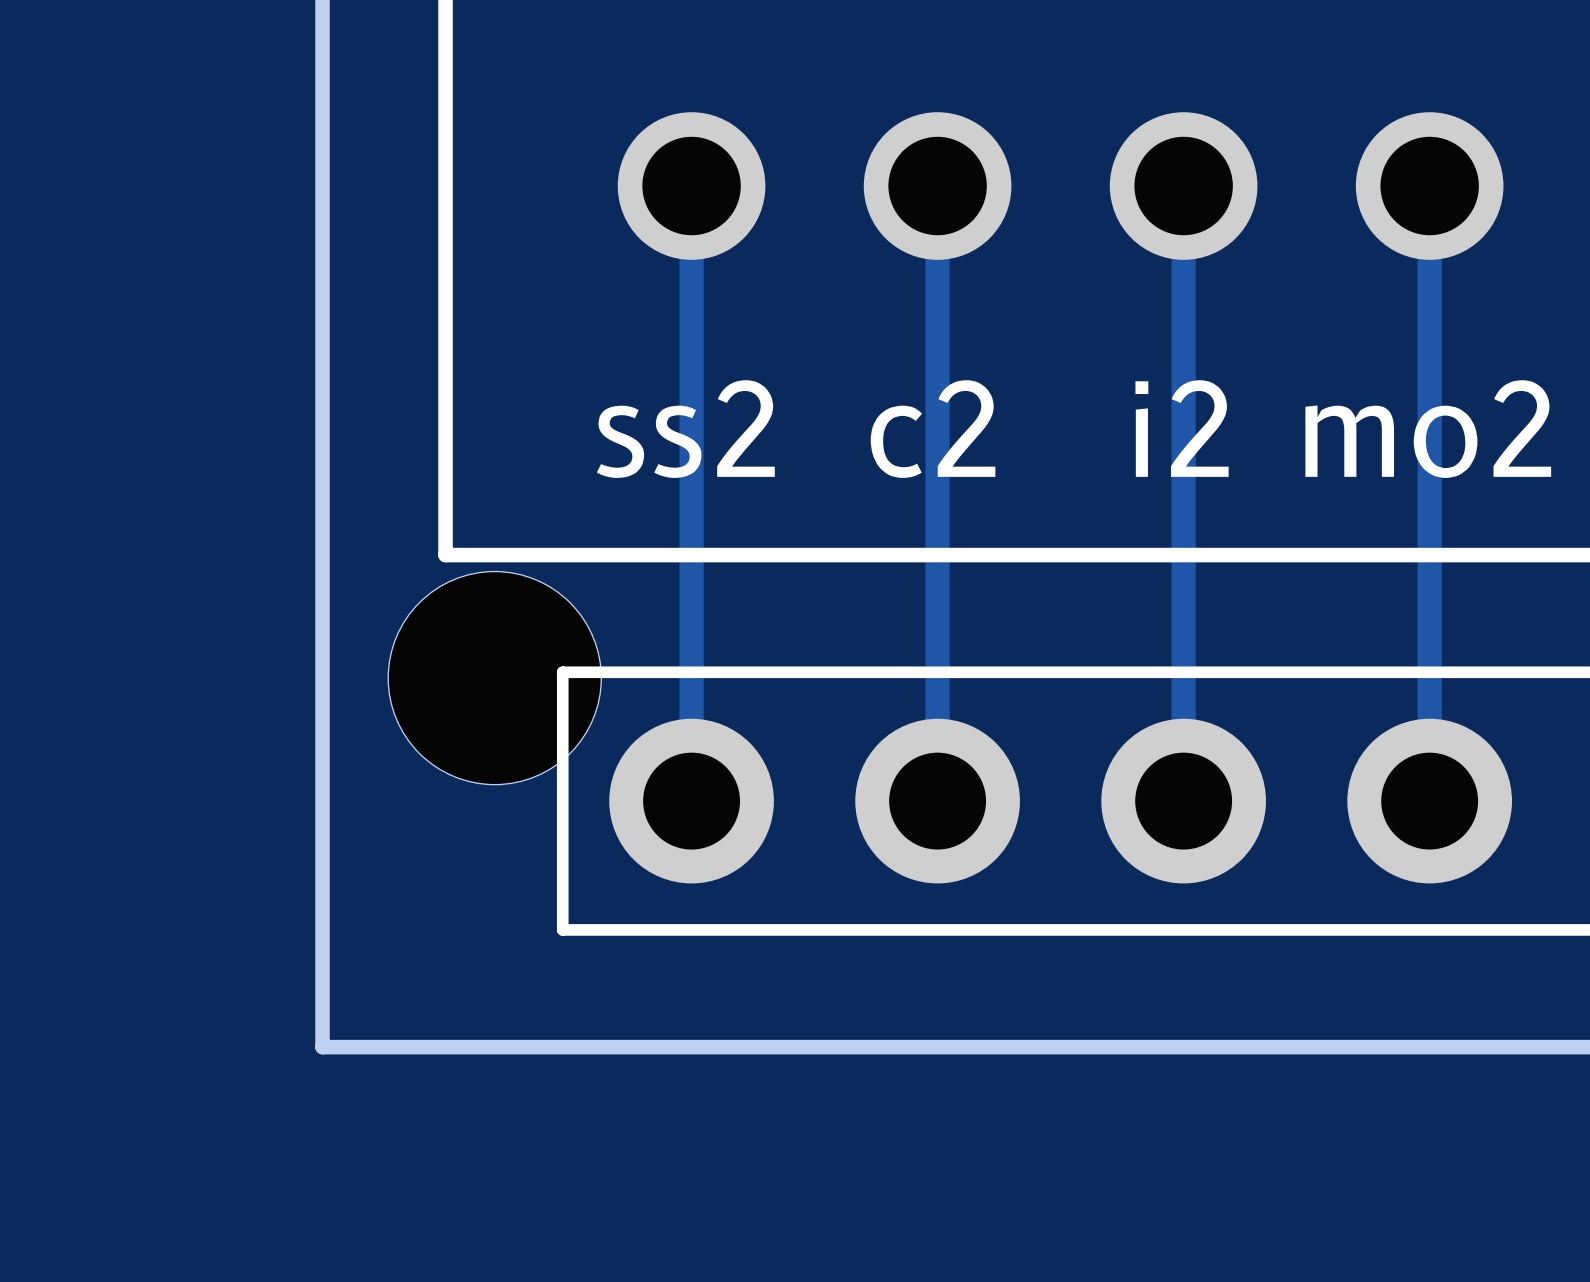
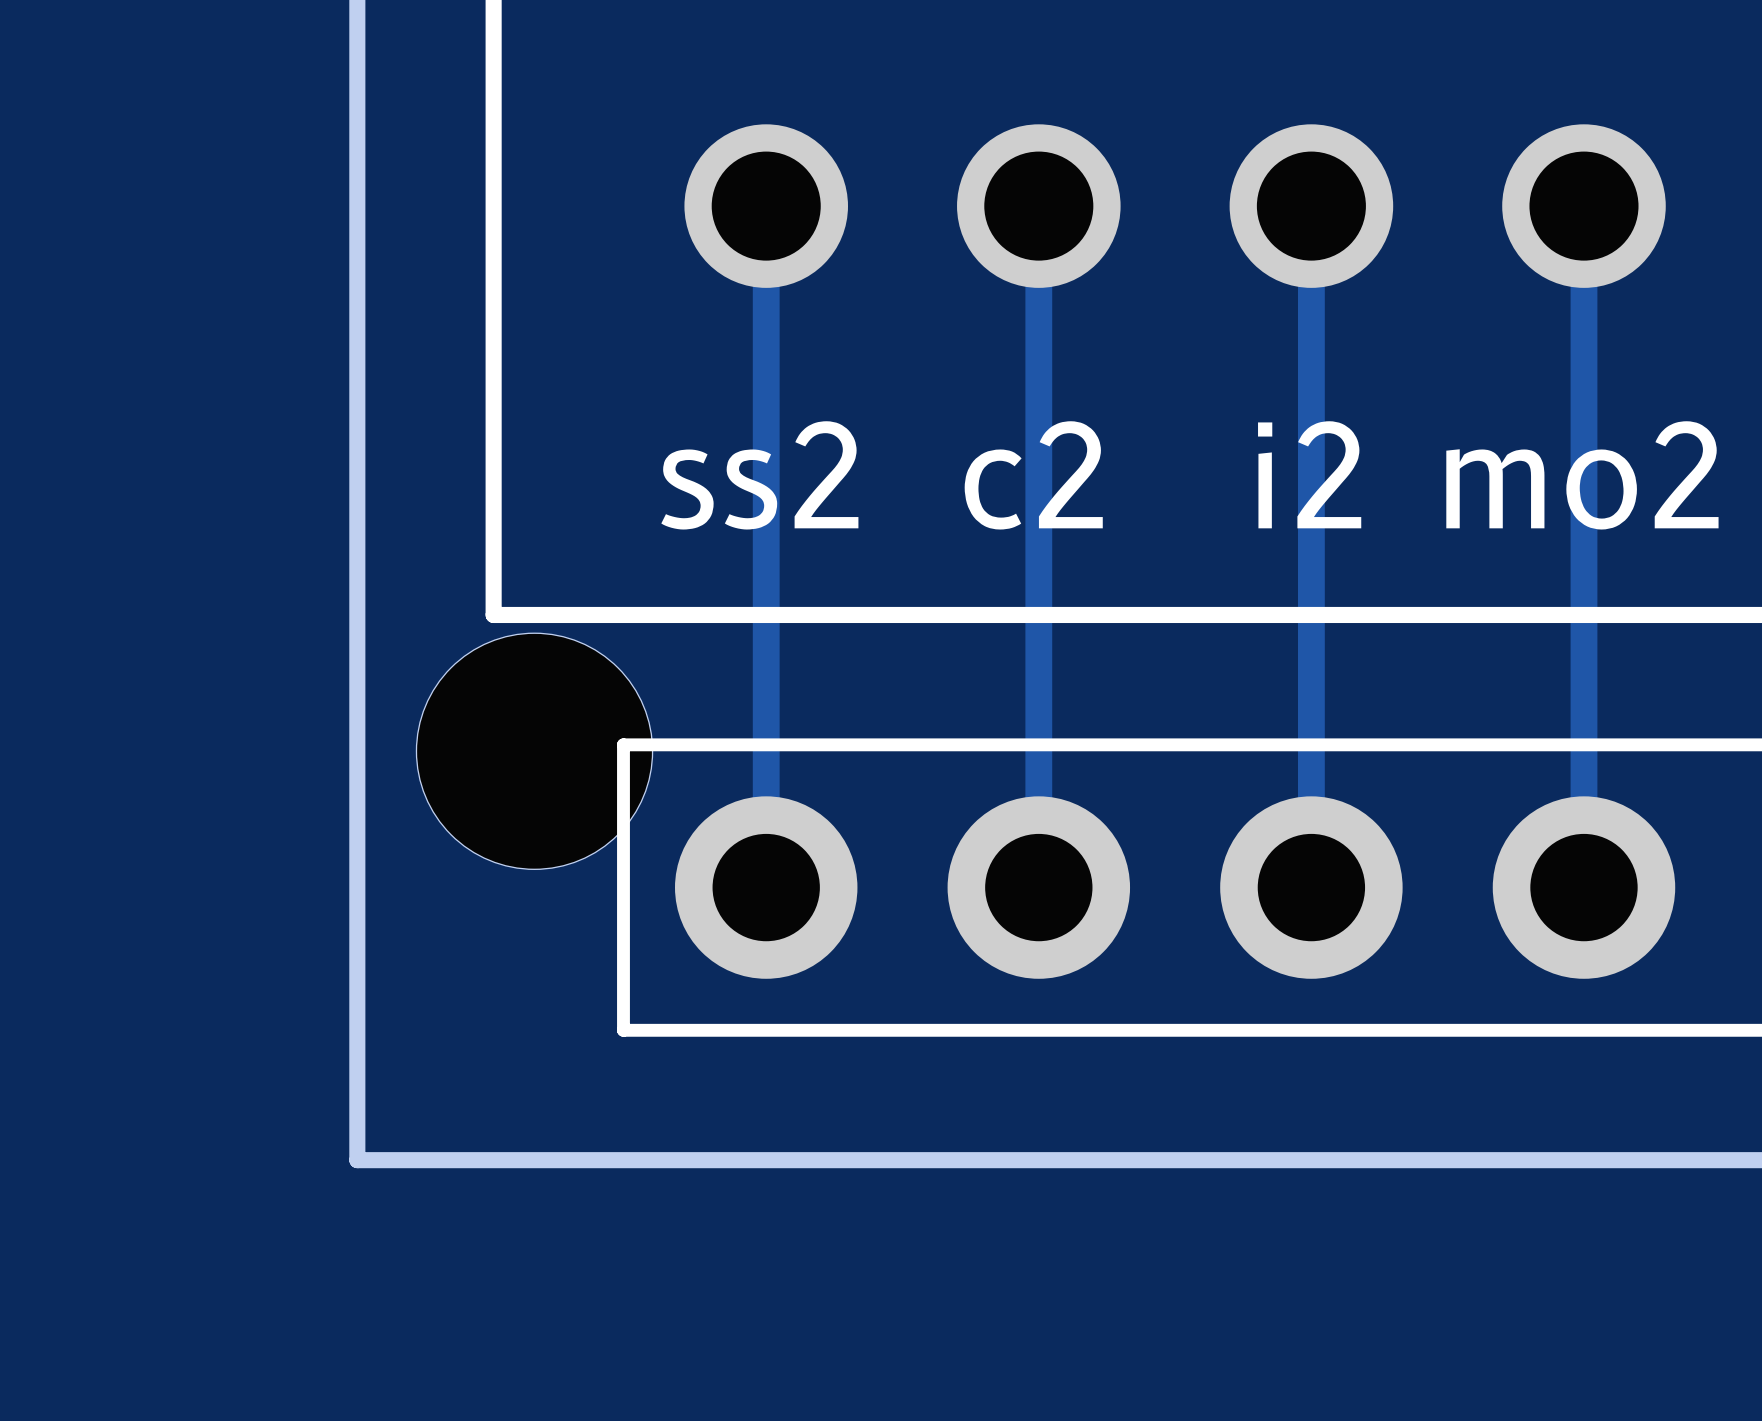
part position: (494, 678) -> (534, 751)

